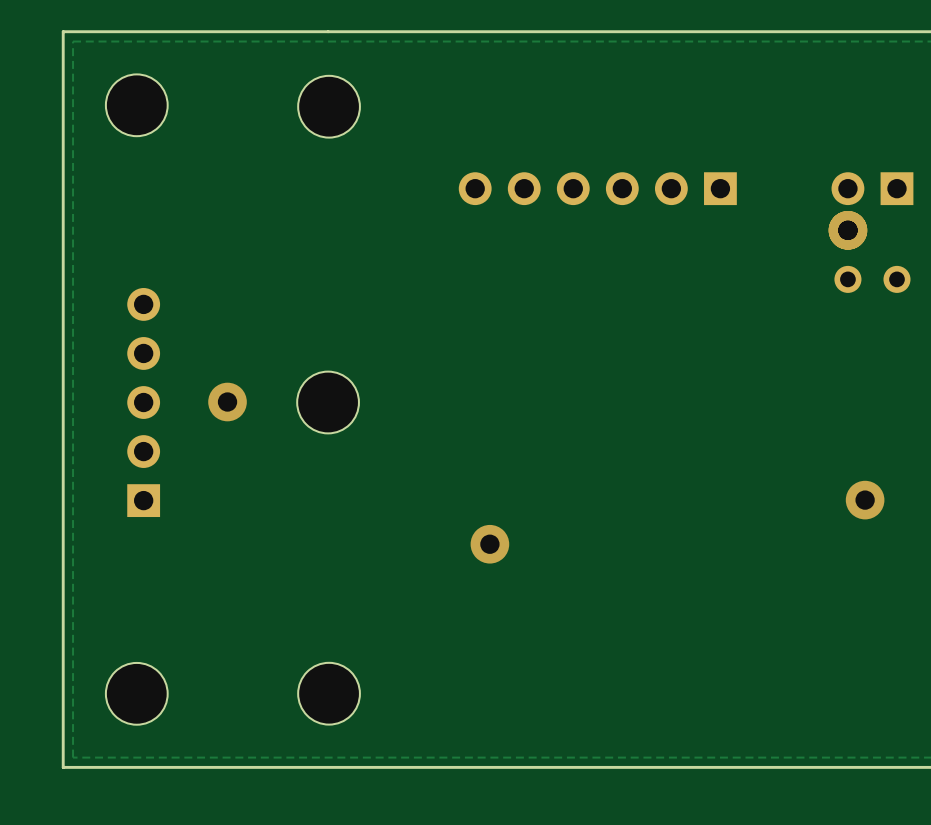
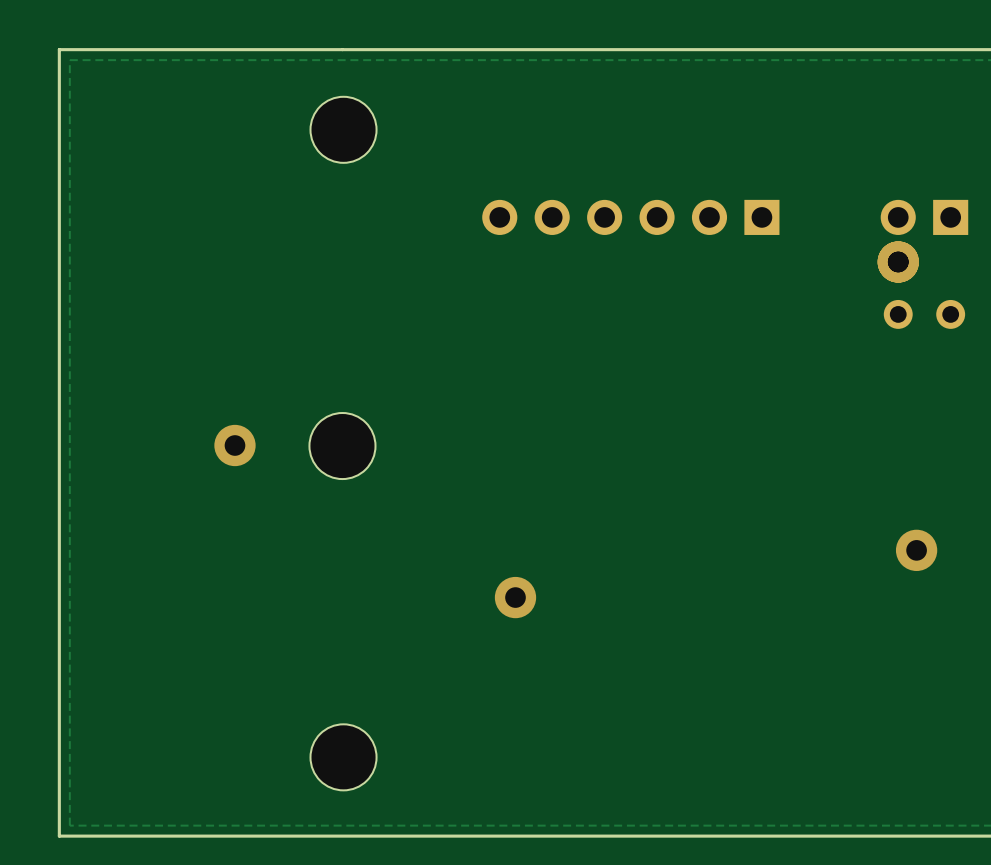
part: (136, 105) -> none
part: (143, 402) -> none
part: (136, 693) -> none

